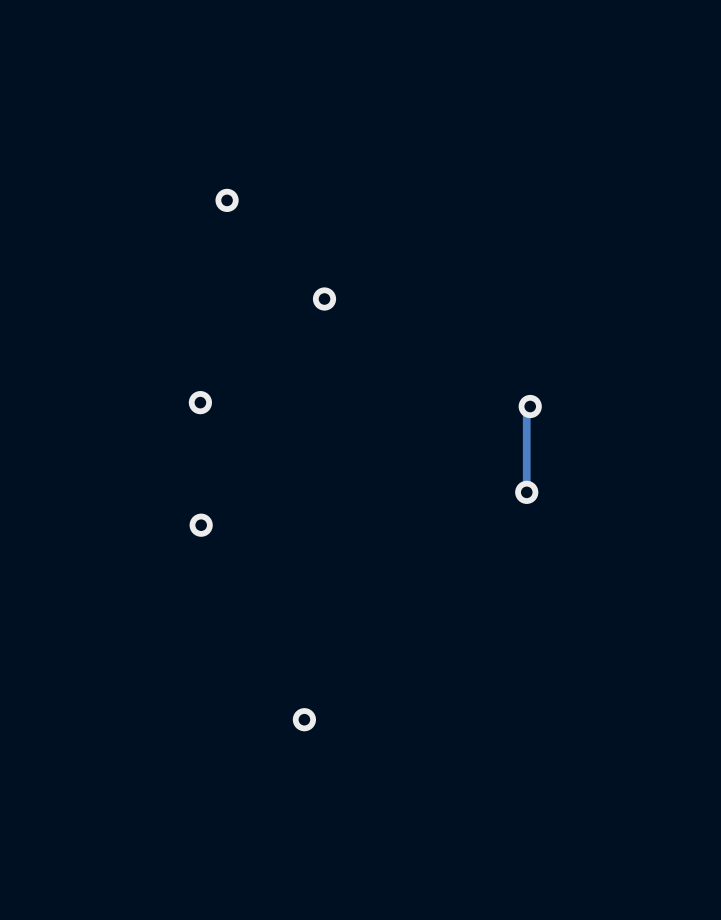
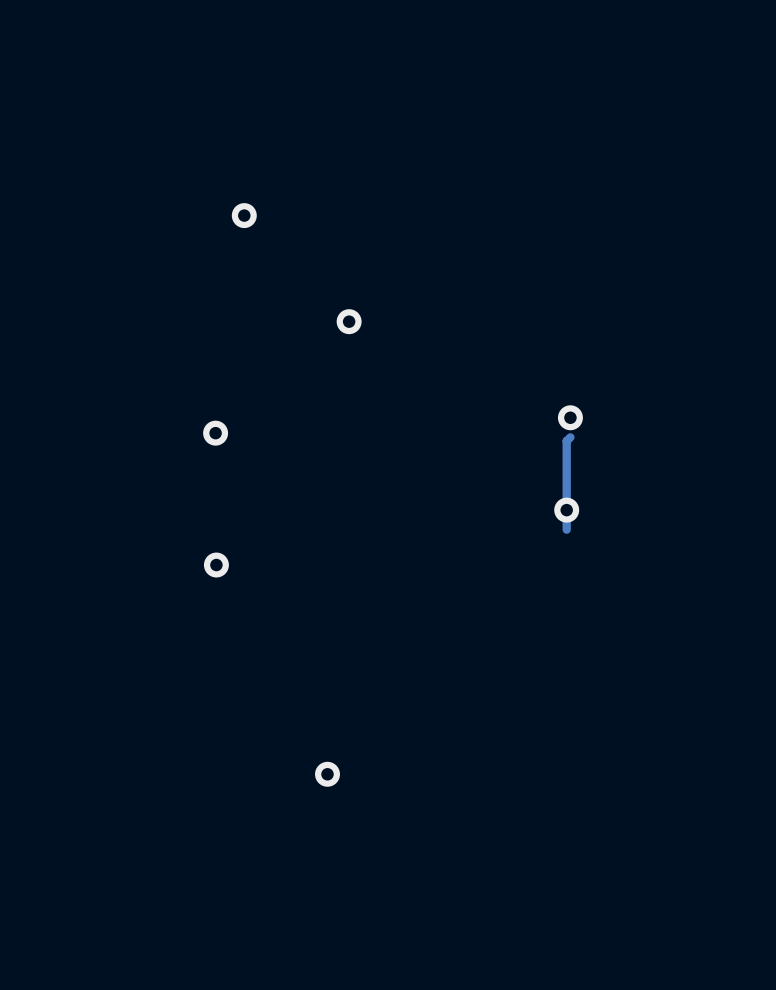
via position: (530, 406) -> (570, 417)
via position: (526, 492) -> (566, 510)

